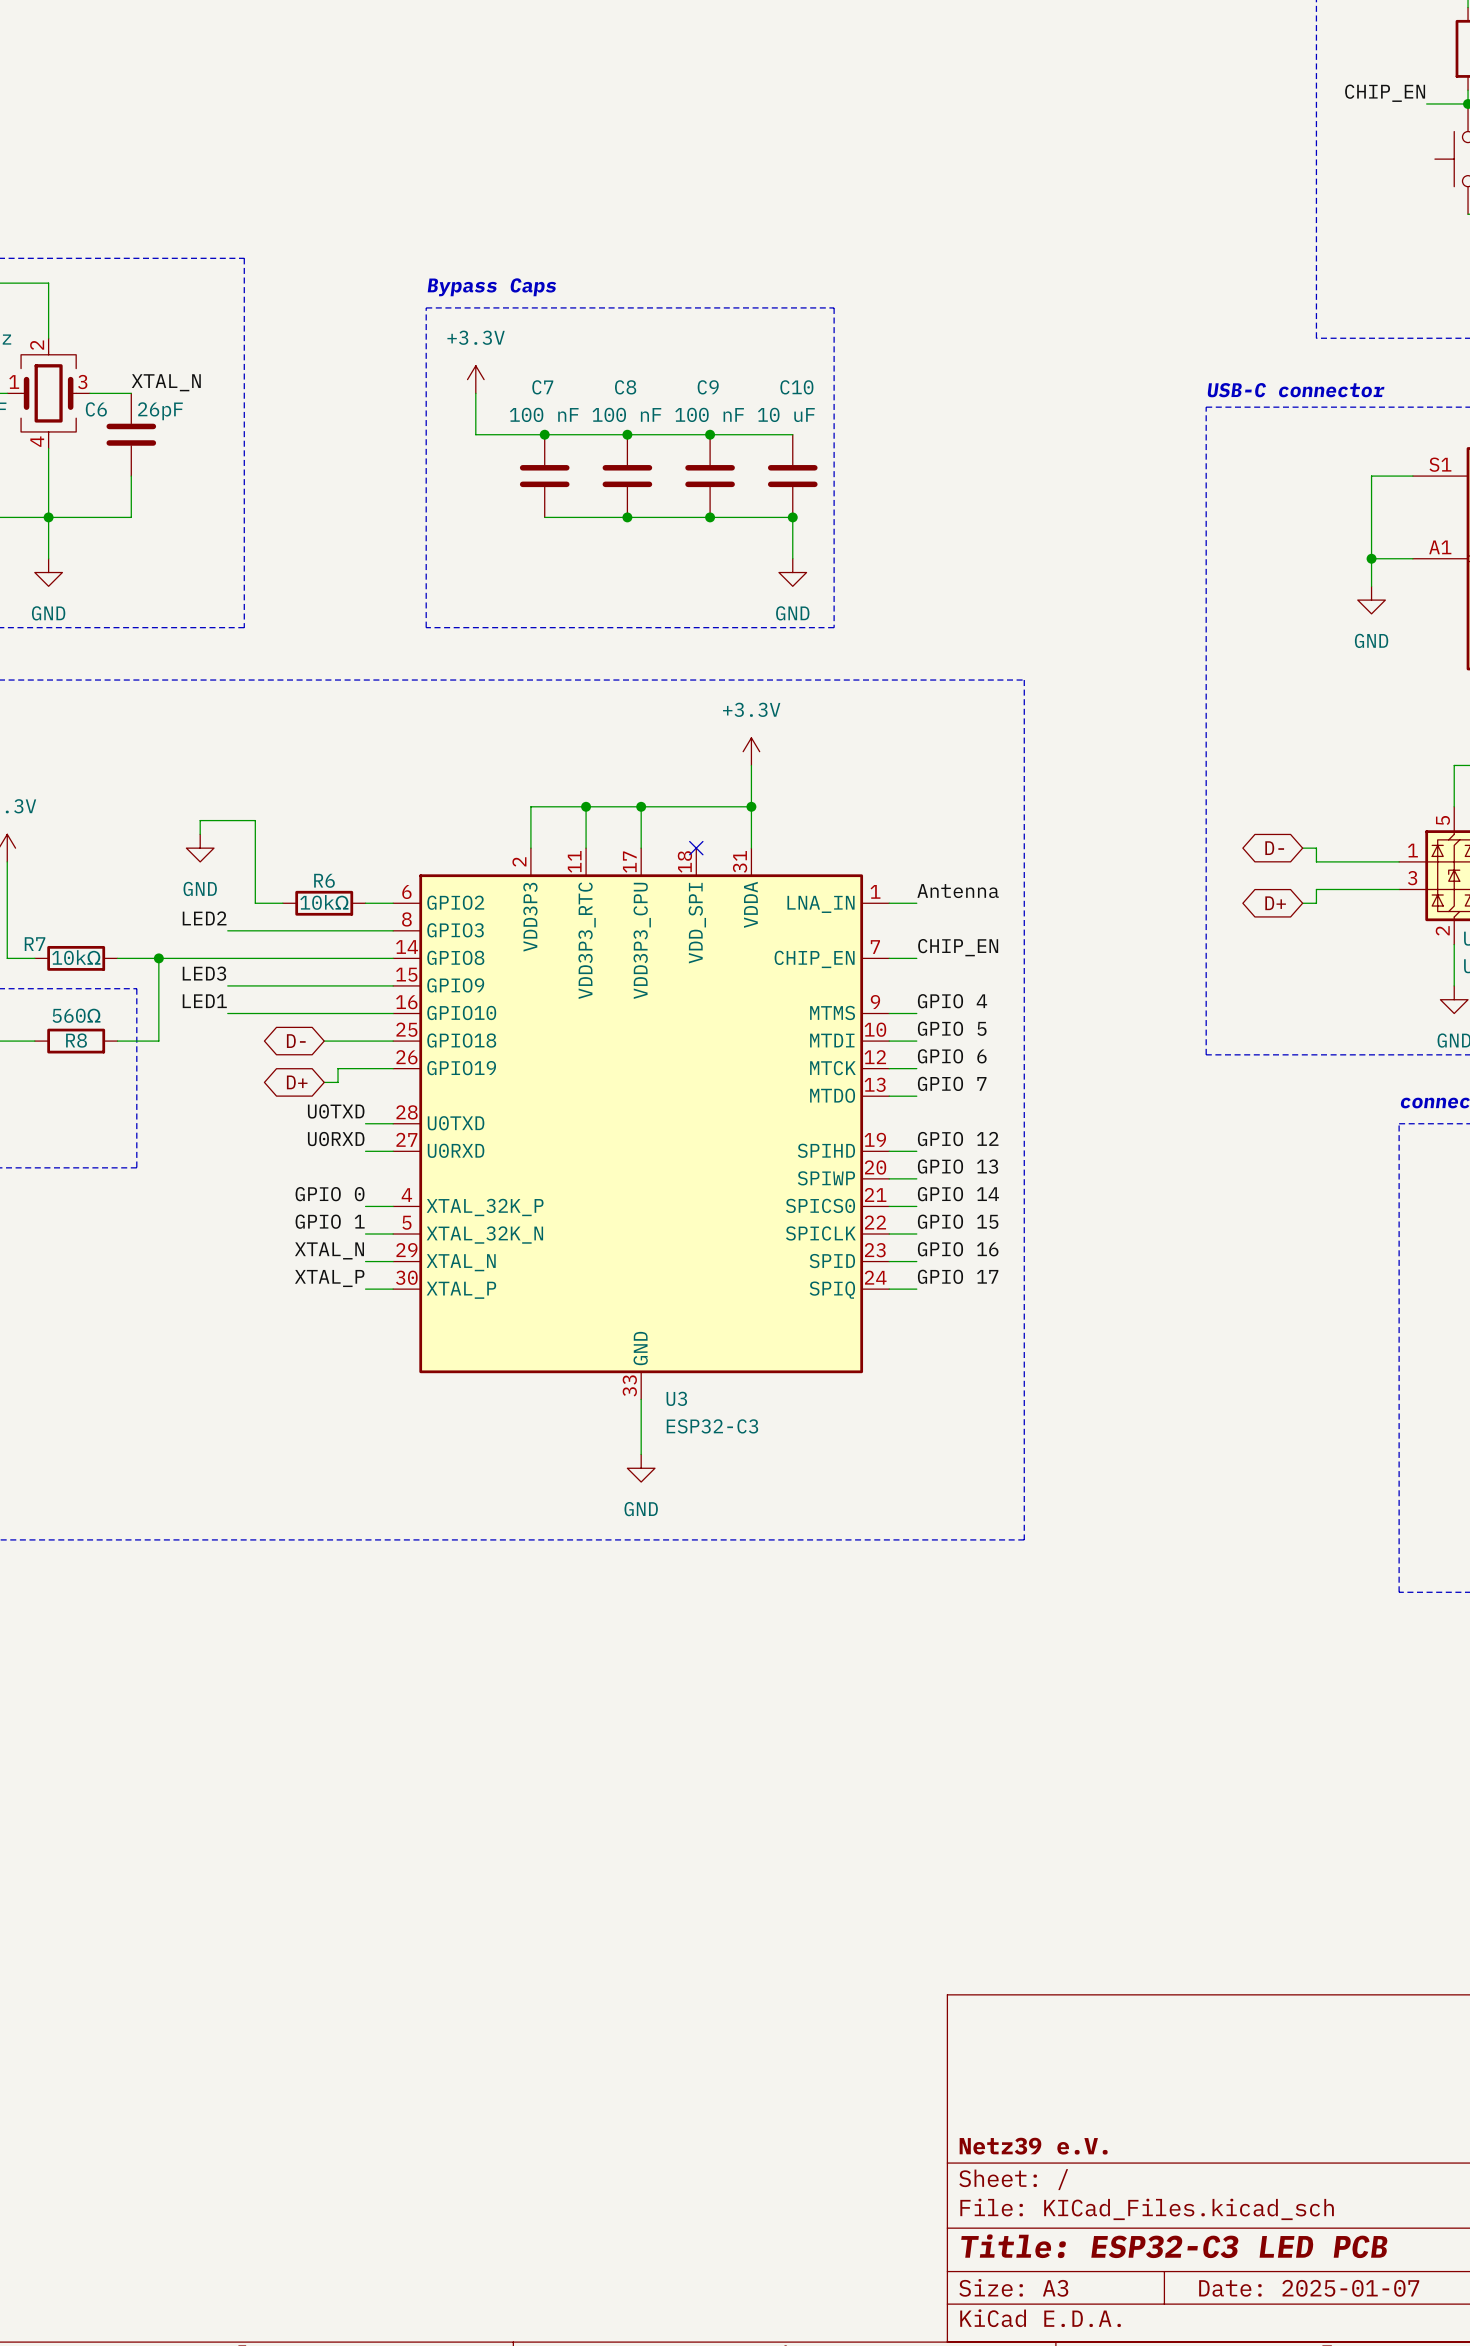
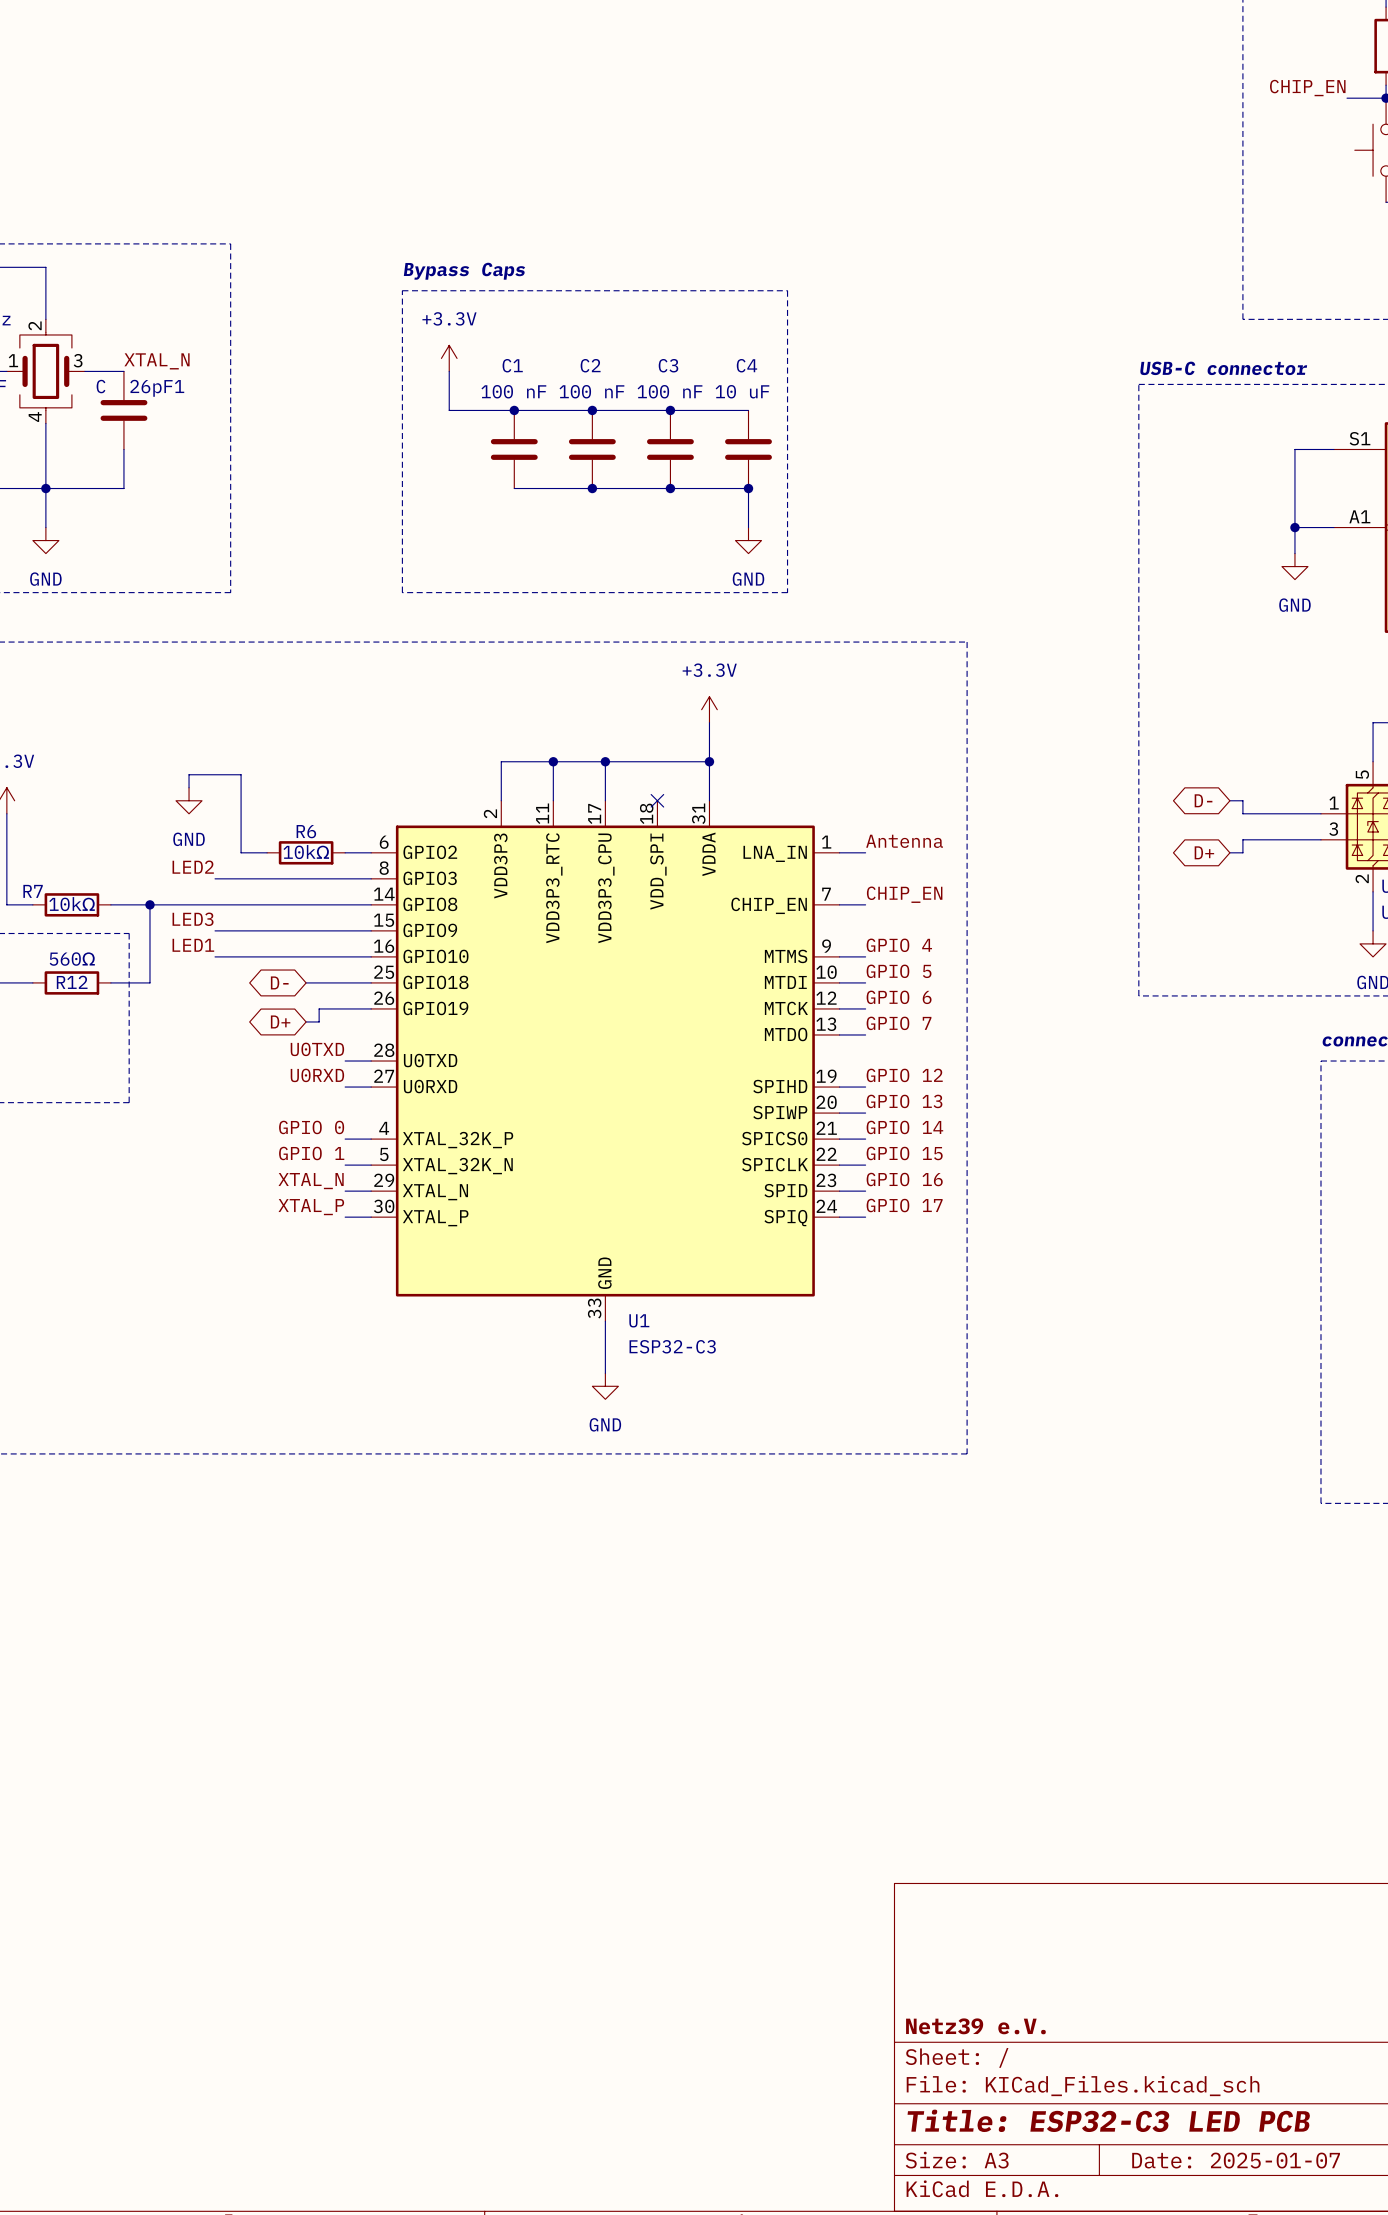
C7 name: C7 (542, 387) -> C1 (512, 365)
C8 name: C8 (625, 387) -> C2 (590, 365)
C9 name: C9 (708, 387) -> C3 (668, 365)
C10 name: C10 (796, 387) -> C4 (746, 365)
C6 name: C6 (96, 409) -> 26pF1 (157, 388)
C6 value: 26pF (160, 411) -> C (101, 386)
R8 name: R8 (76, 1040) -> R12 (72, 982)
U3 name: U3 (676, 1398) -> U1 (639, 1320)

